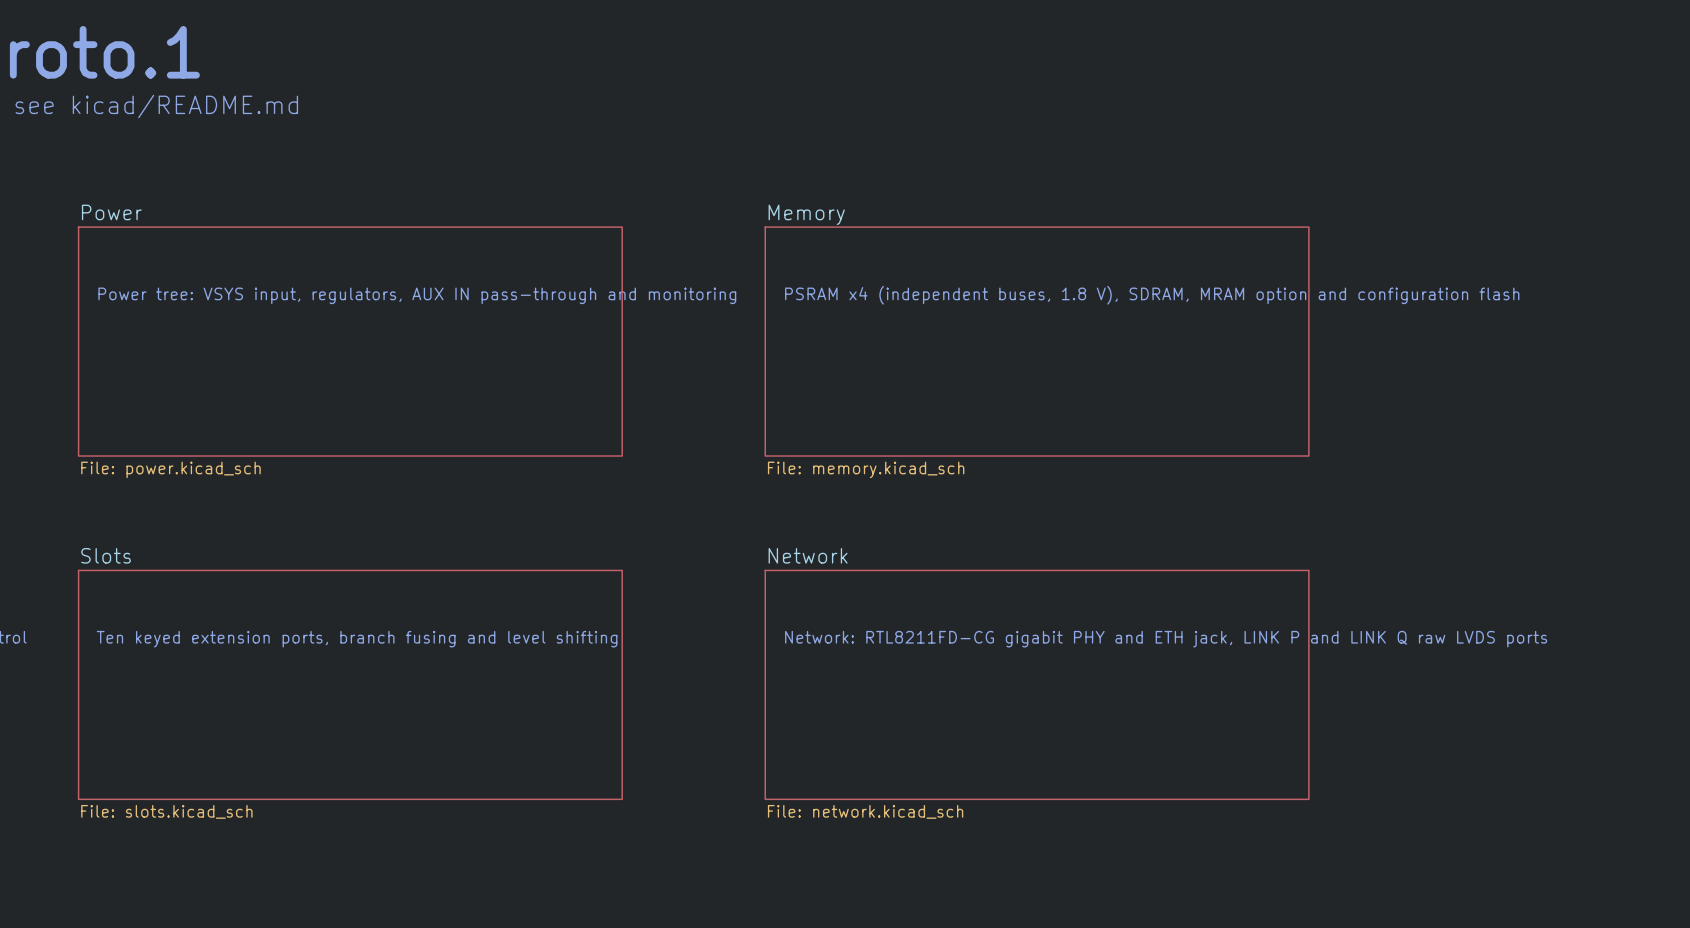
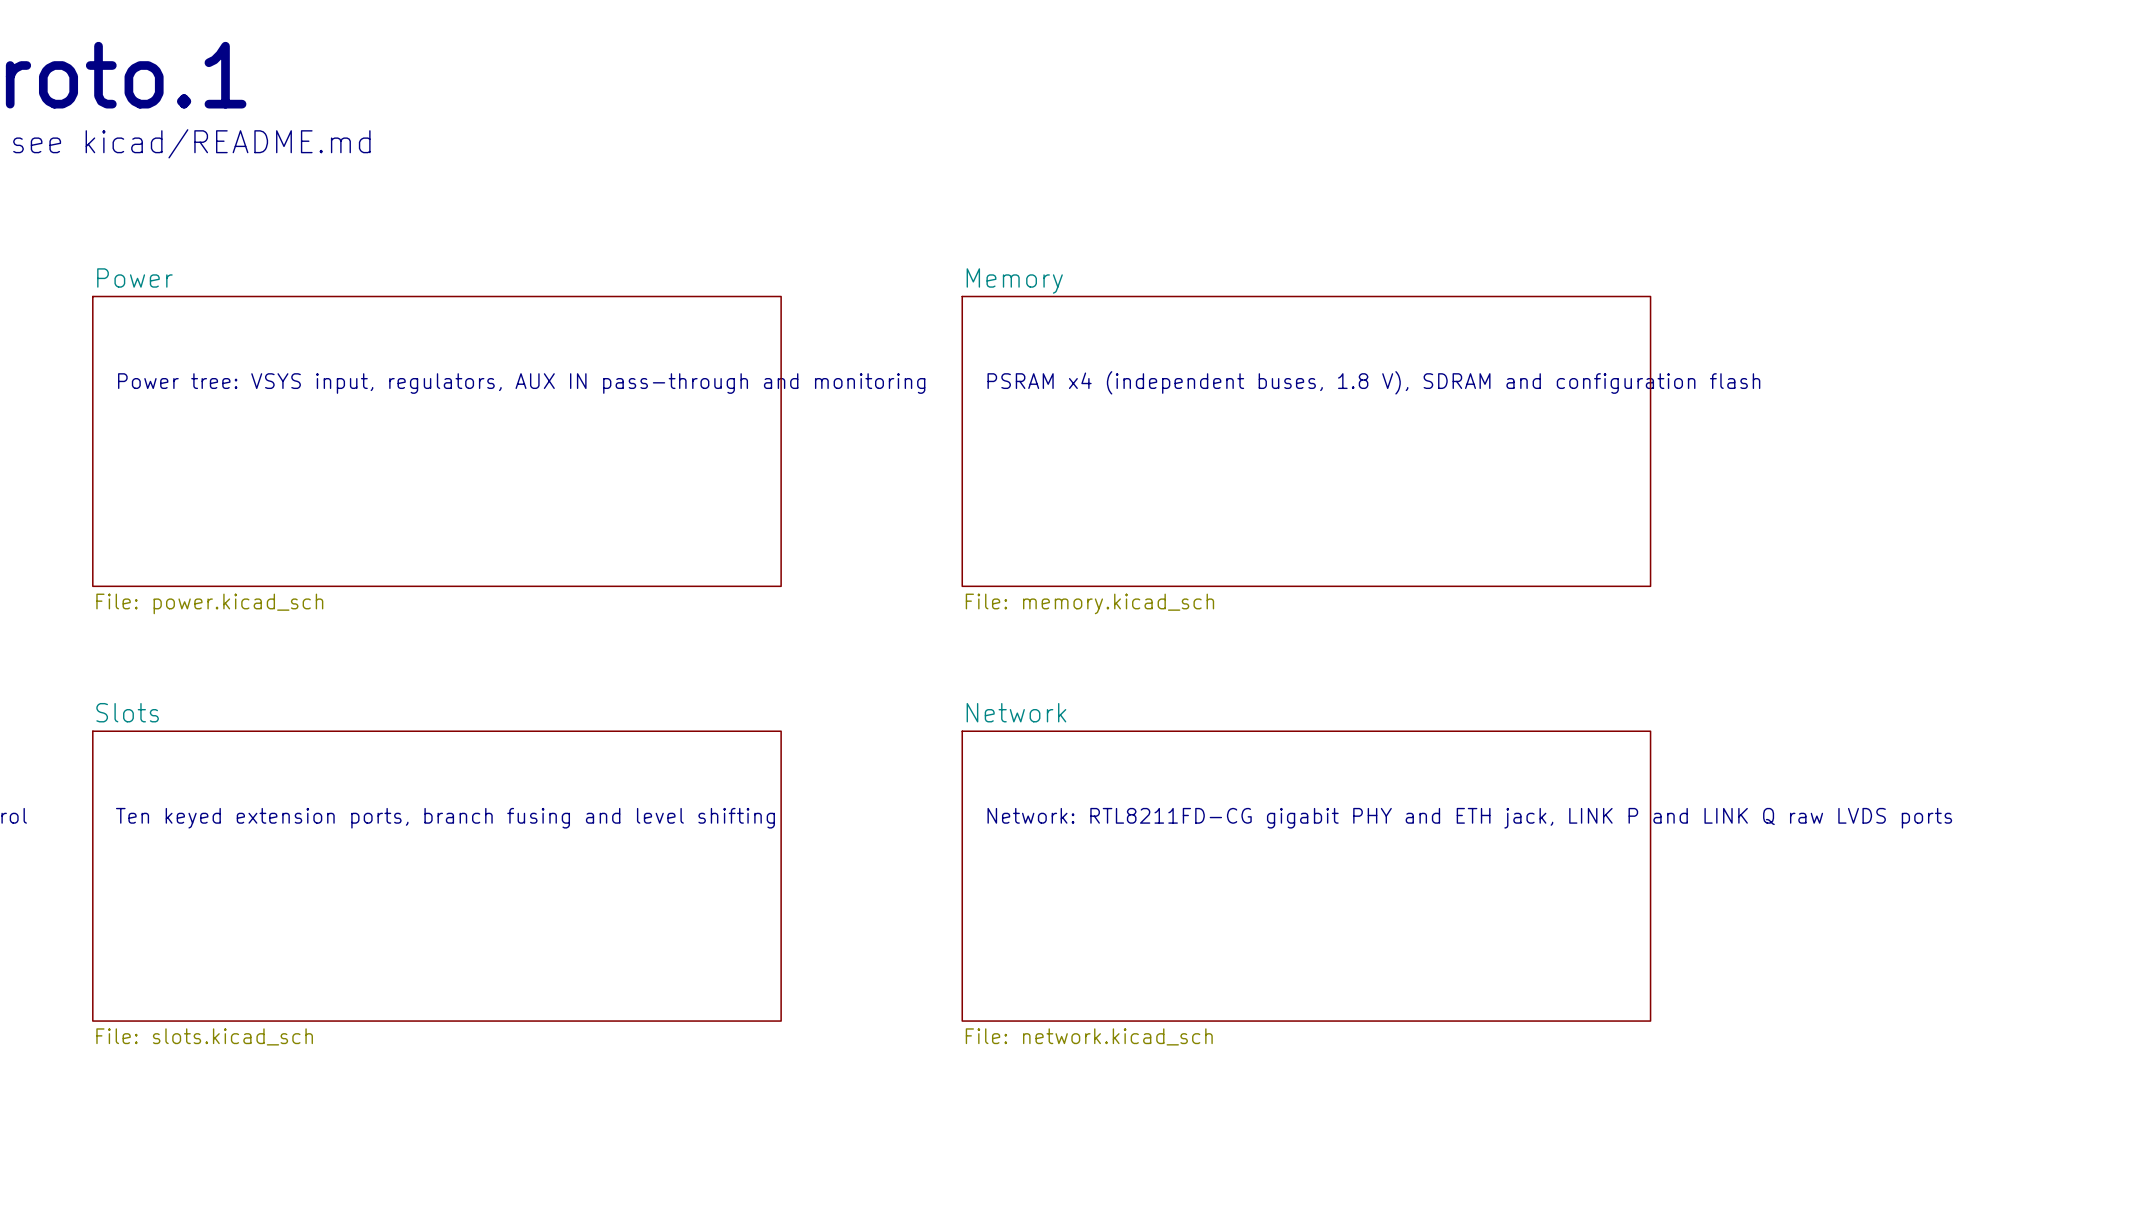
text: PSRAM x4 (independent buses, 1.8 V), SDRAM, MRAM option and configuration flash (1152, 295) -> PSRAM x4 (independent buses, 1.8 V), SDRAM and configuration flash (1373, 382)

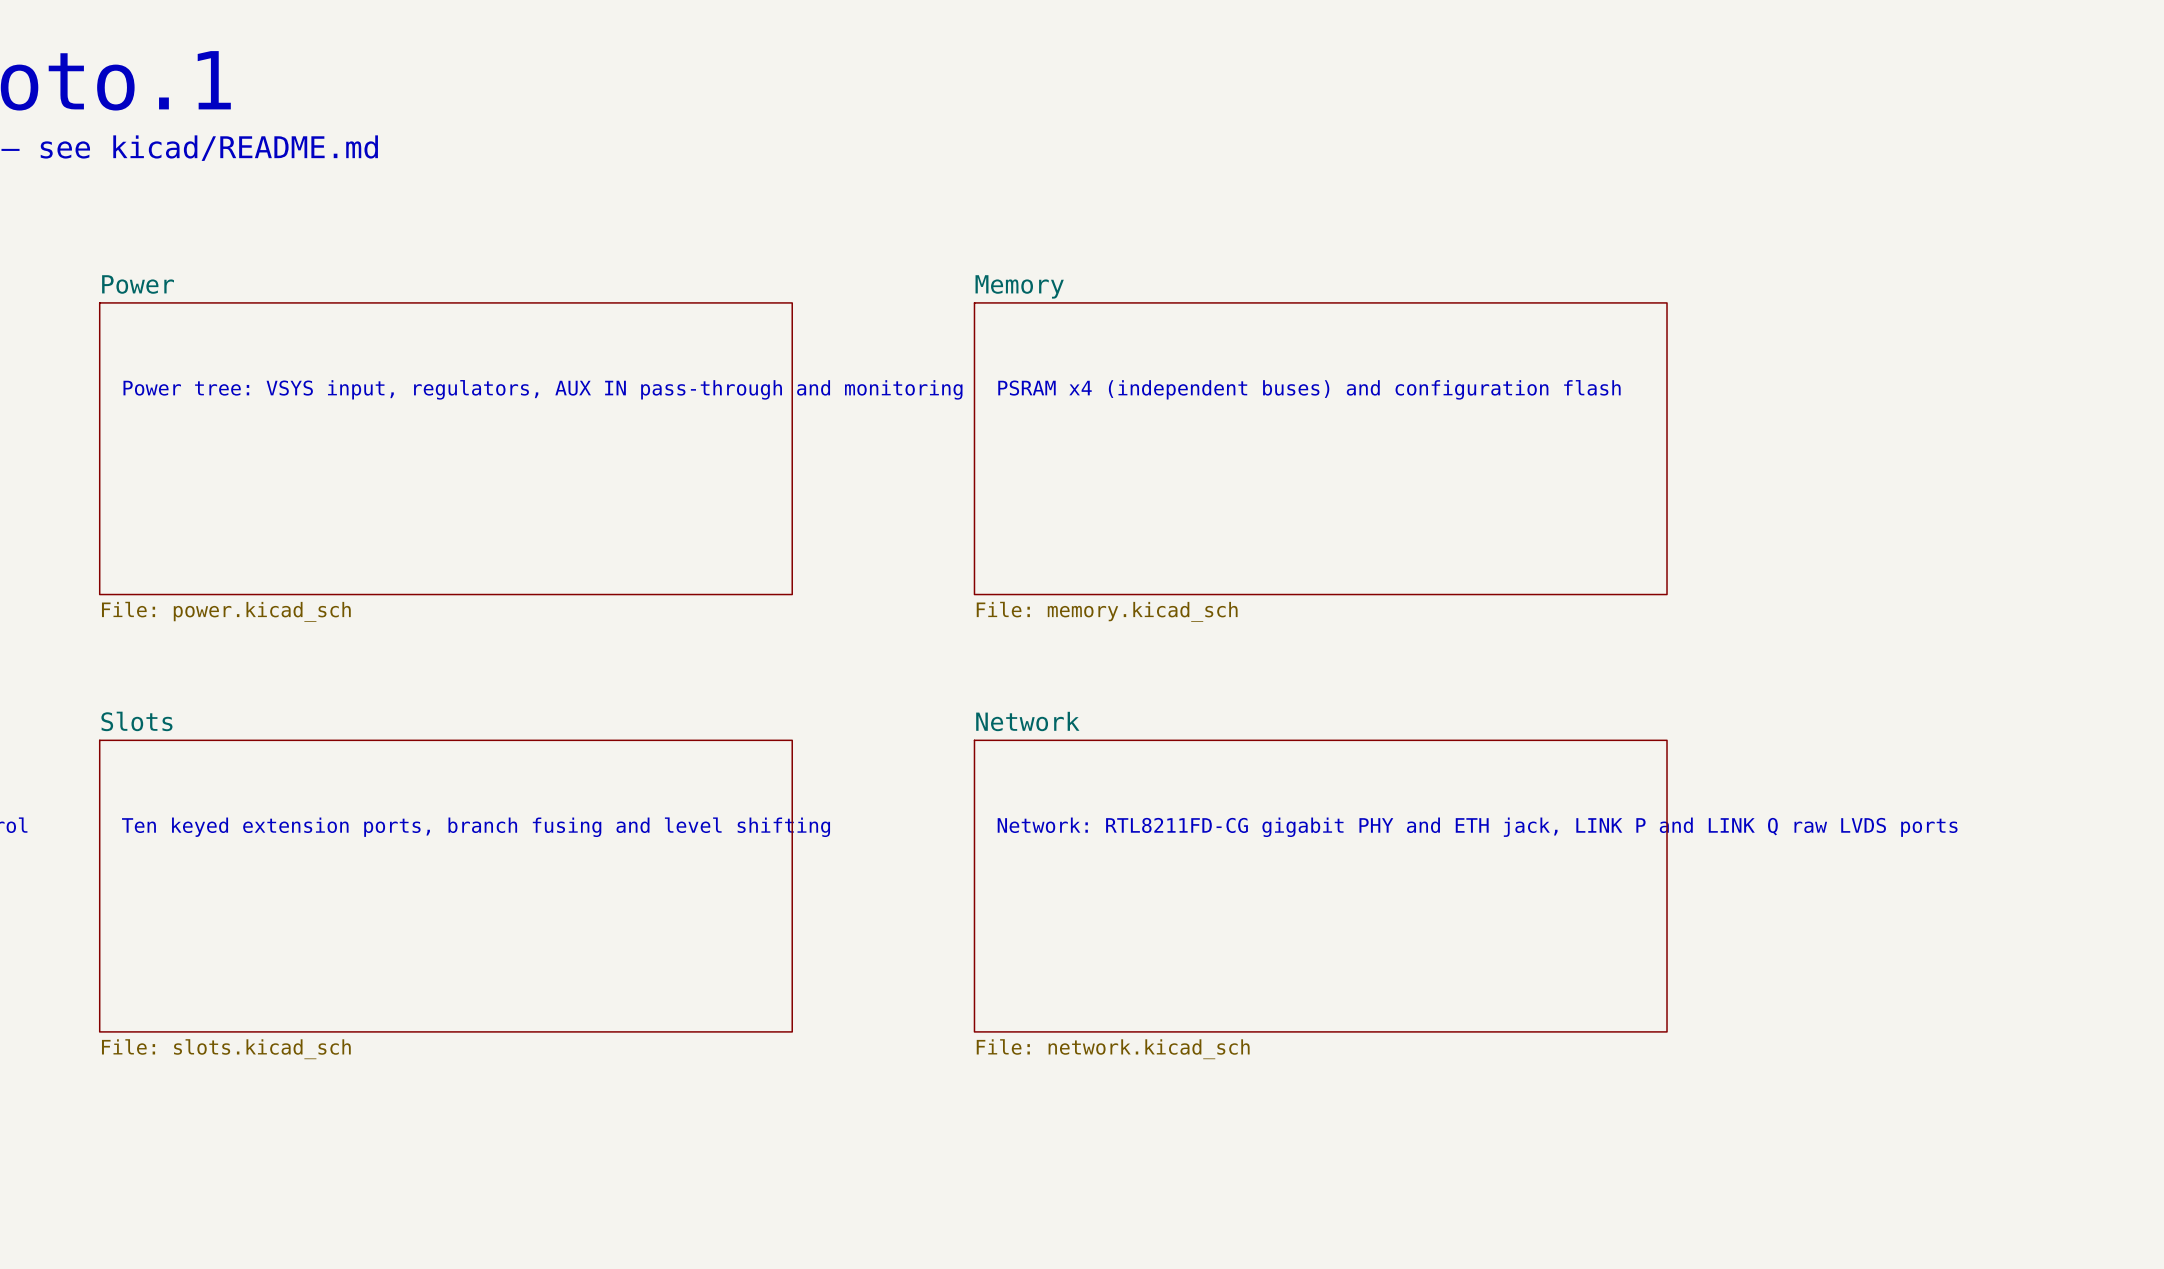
text: PSRAM x4 (independent buses, 1.8 V), SDRAM and configuration flash (1373, 382) -> PSRAM x4 (independent buses) and configuration flash (1309, 389)

